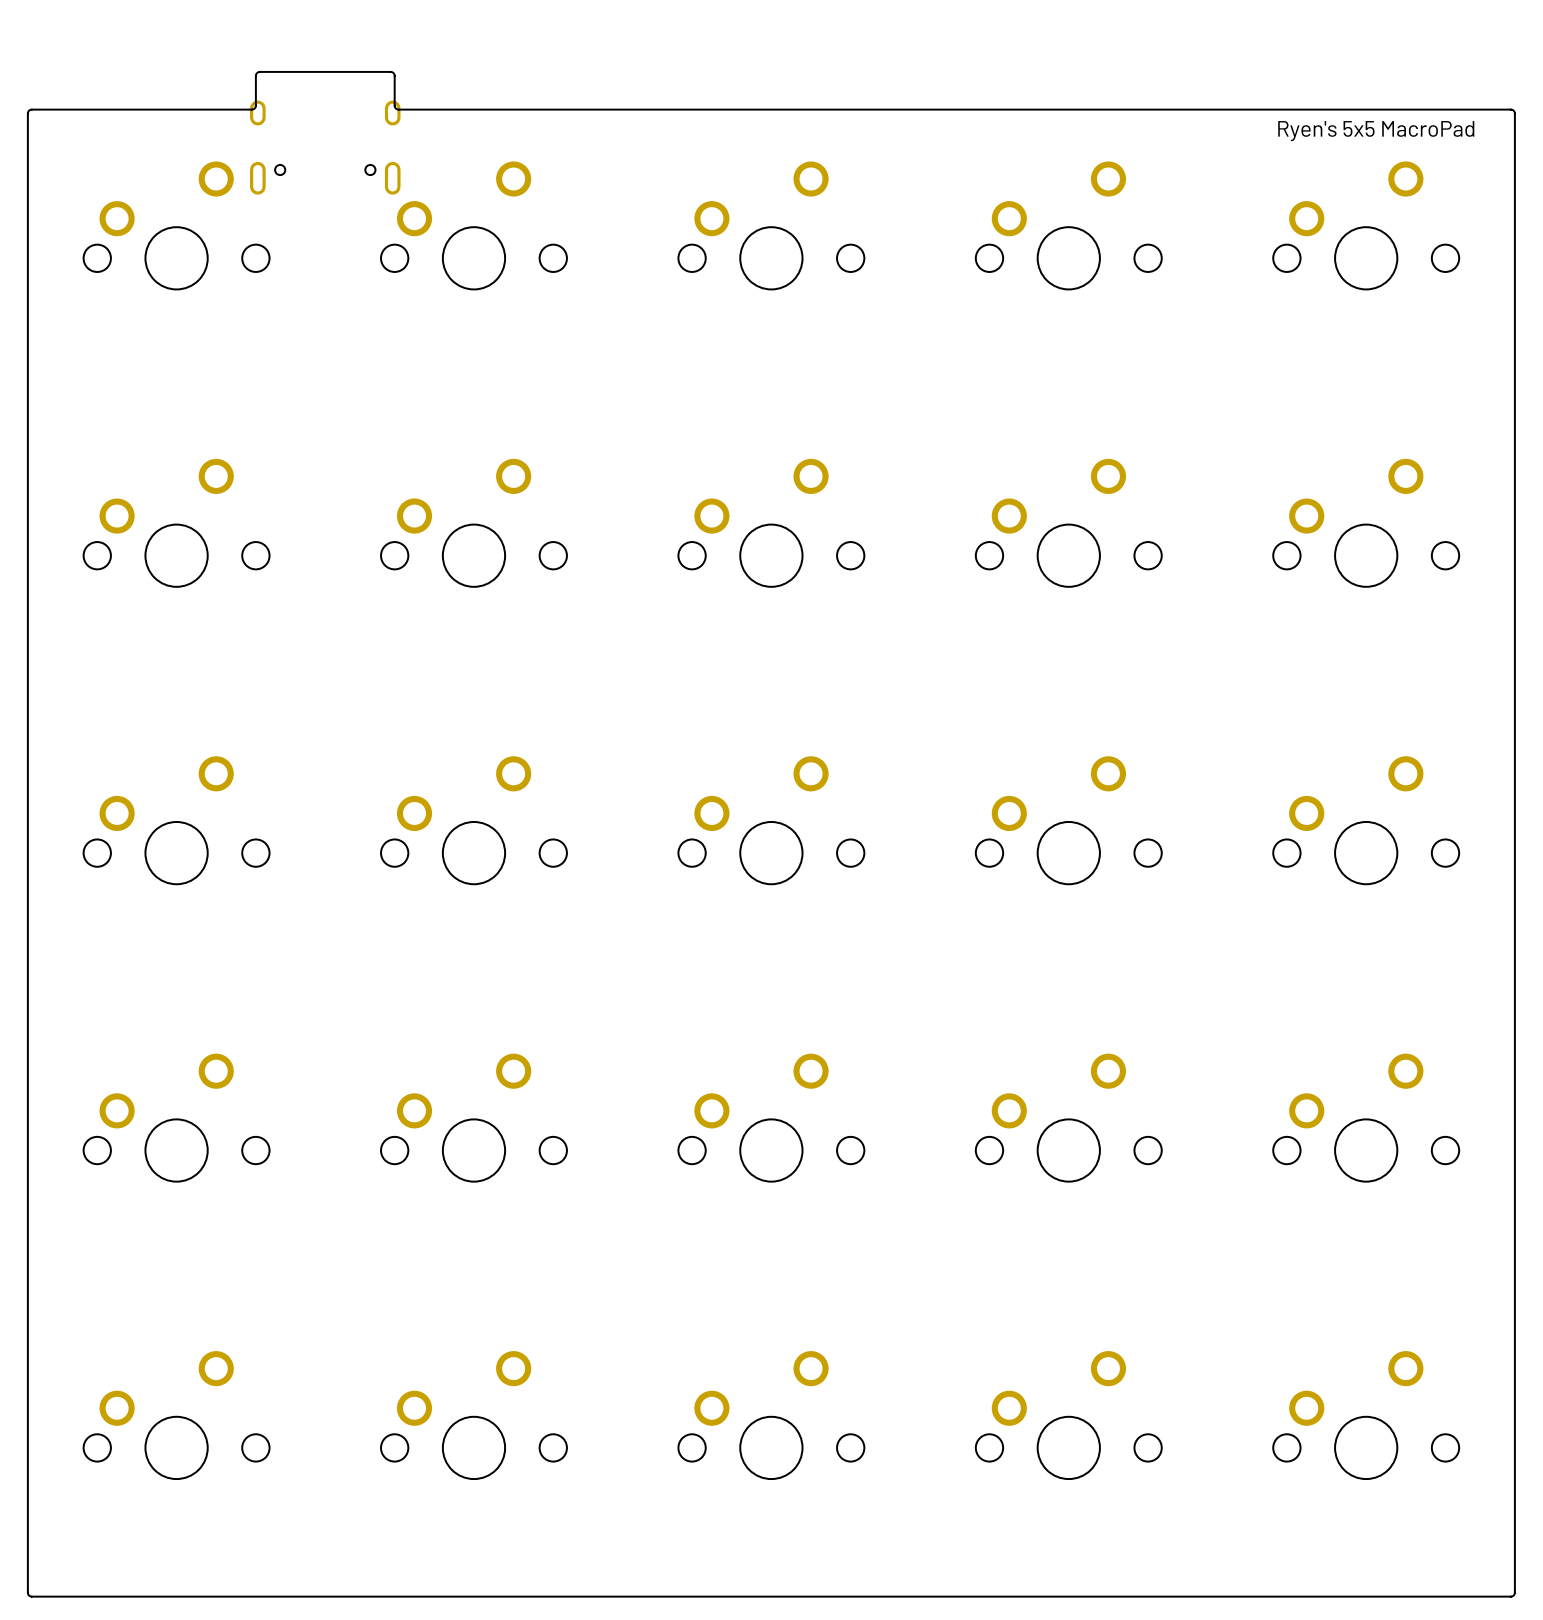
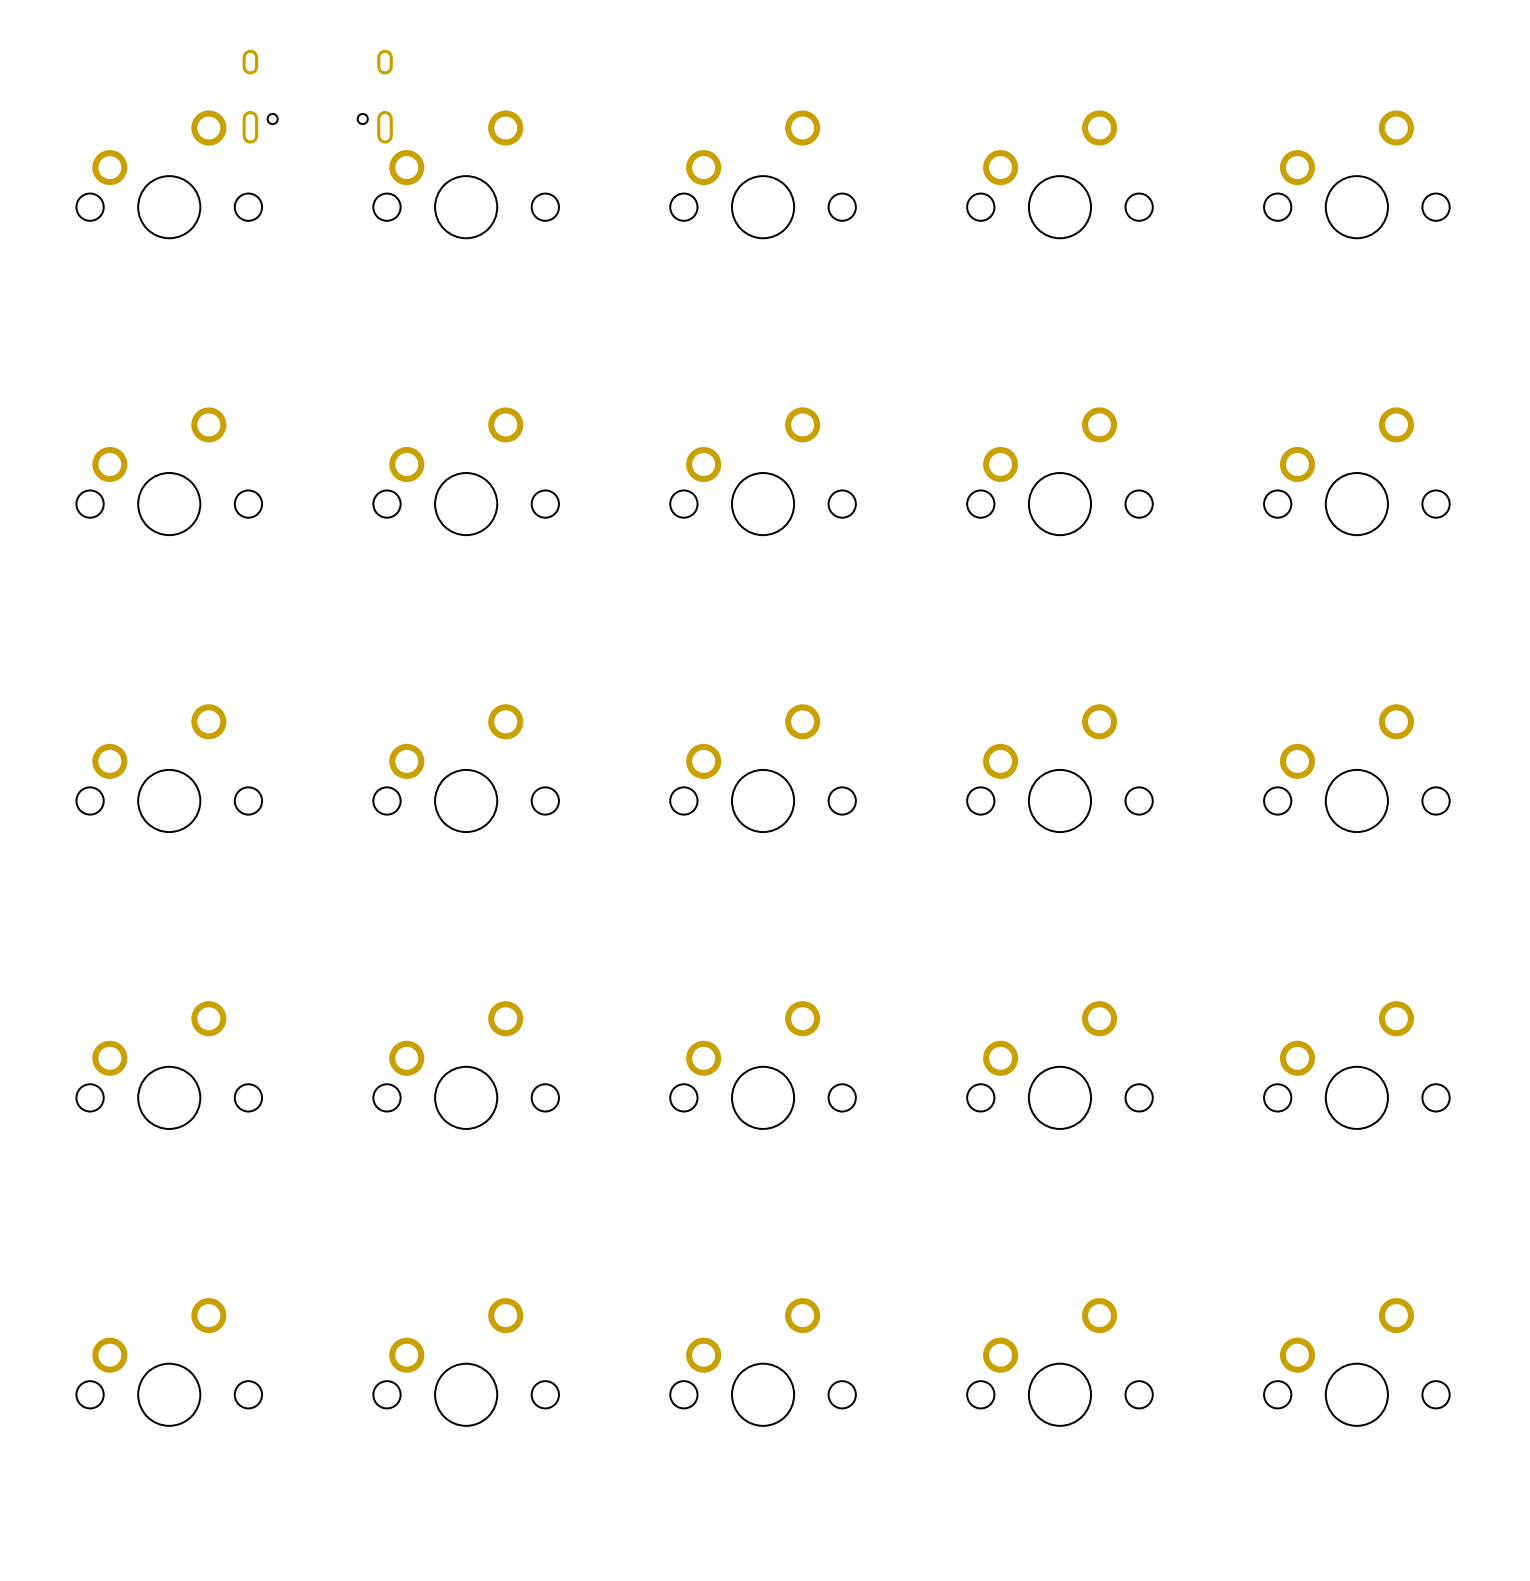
board edge: (259, 71) (391, 72) (394, 75) (394, 106) (398, 109) (1510, 109) (1514, 111) (1514, 1592) (1513, 1595) (31, 1596) (28, 1595) (27, 113) (31, 109) (252, 109) (255, 106) (255, 75) (259, 71) -> none
text: Ryen's 5x5 MacroPad (1376, 131) -> none

